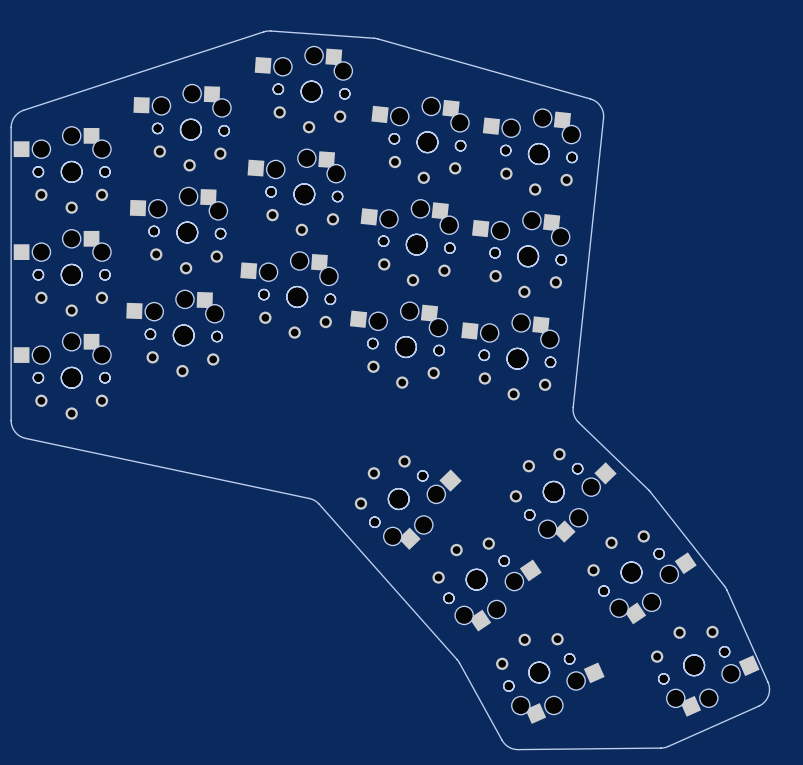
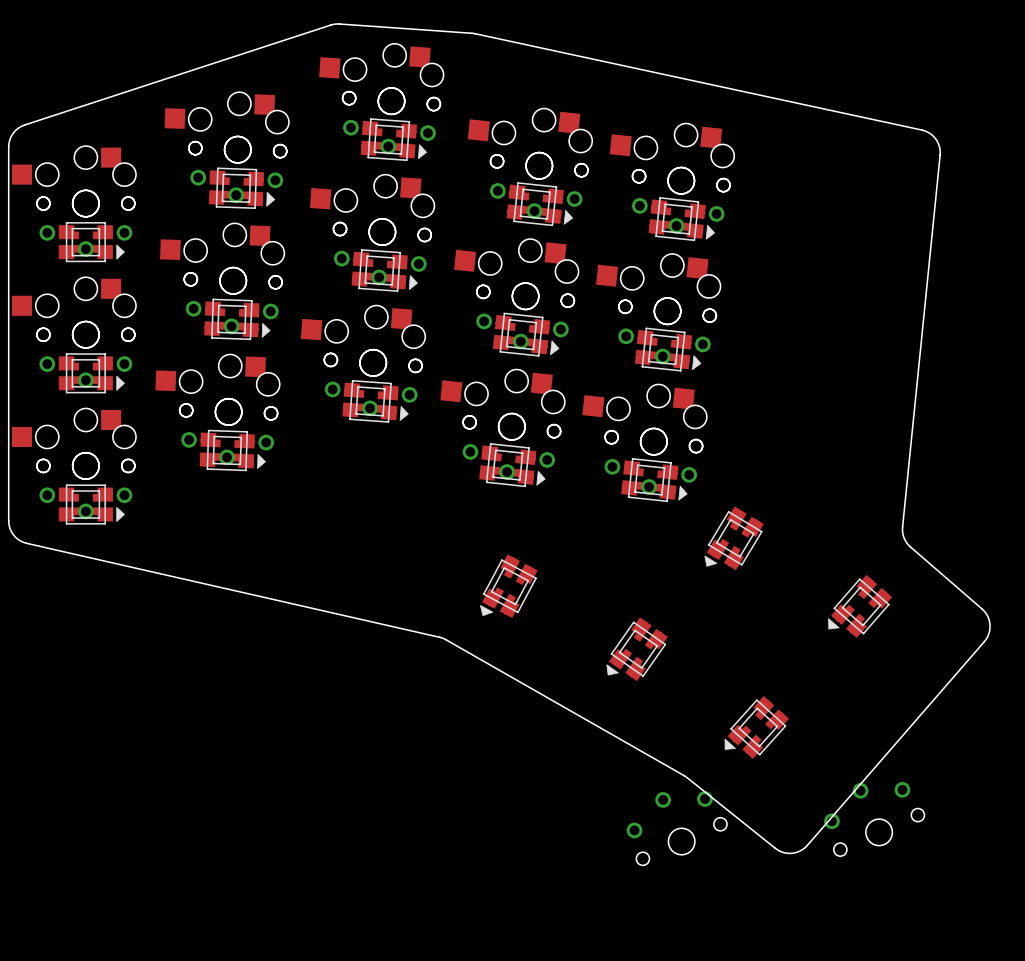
board edge: (374, 38) (590, 98) (601, 108) (603, 118) (573, 413) (578, 422) (649, 490) (725, 588) (768, 684) (769, 693) (764, 702) (664, 747) (512, 748) (502, 740) (457, 659) (314, 500) (25, 438) (15, 432) (11, 420) -> (471, 33) (921, 130) (932, 134) (938, 143) (940, 155) (902, 532) (910, 546) (983, 610) (989, 619) (989, 630) (984, 641) (807, 845) (794, 852) (786, 853) (777, 850) (685, 776) (442, 638) (26, 543) (13, 535) (8, 520)
part: none -> (393, 139)
part: none -> (241, 188)
part: none -> (539, 204)
part: none -> (681, 219)
part: none -> (91, 242)
part: none -> (384, 270)
part: none -> (237, 319)
part: none -> (526, 334)
part: none -> (668, 349)
part: none -> (91, 373)
part: none -> (375, 401)
part: none -> (232, 450)
part: none -> (512, 465)
part: none -> (654, 480)
part: none -> (91, 504)
part: none -> (734, 538)
part: none -> (508, 586)
part: (546, 484) -> none
part: none -> (860, 606)
part: (391, 491) -> none
part: (570, 502) -> none
part: (415, 509) -> none
part: none -> (637, 649)
part: (625, 563) -> none
part: (470, 570) -> none
part: none -> (756, 727)
part: (647, 586) -> none
part: (492, 593) -> none
part: (709, 681) -> none
part: (554, 688) -> none

